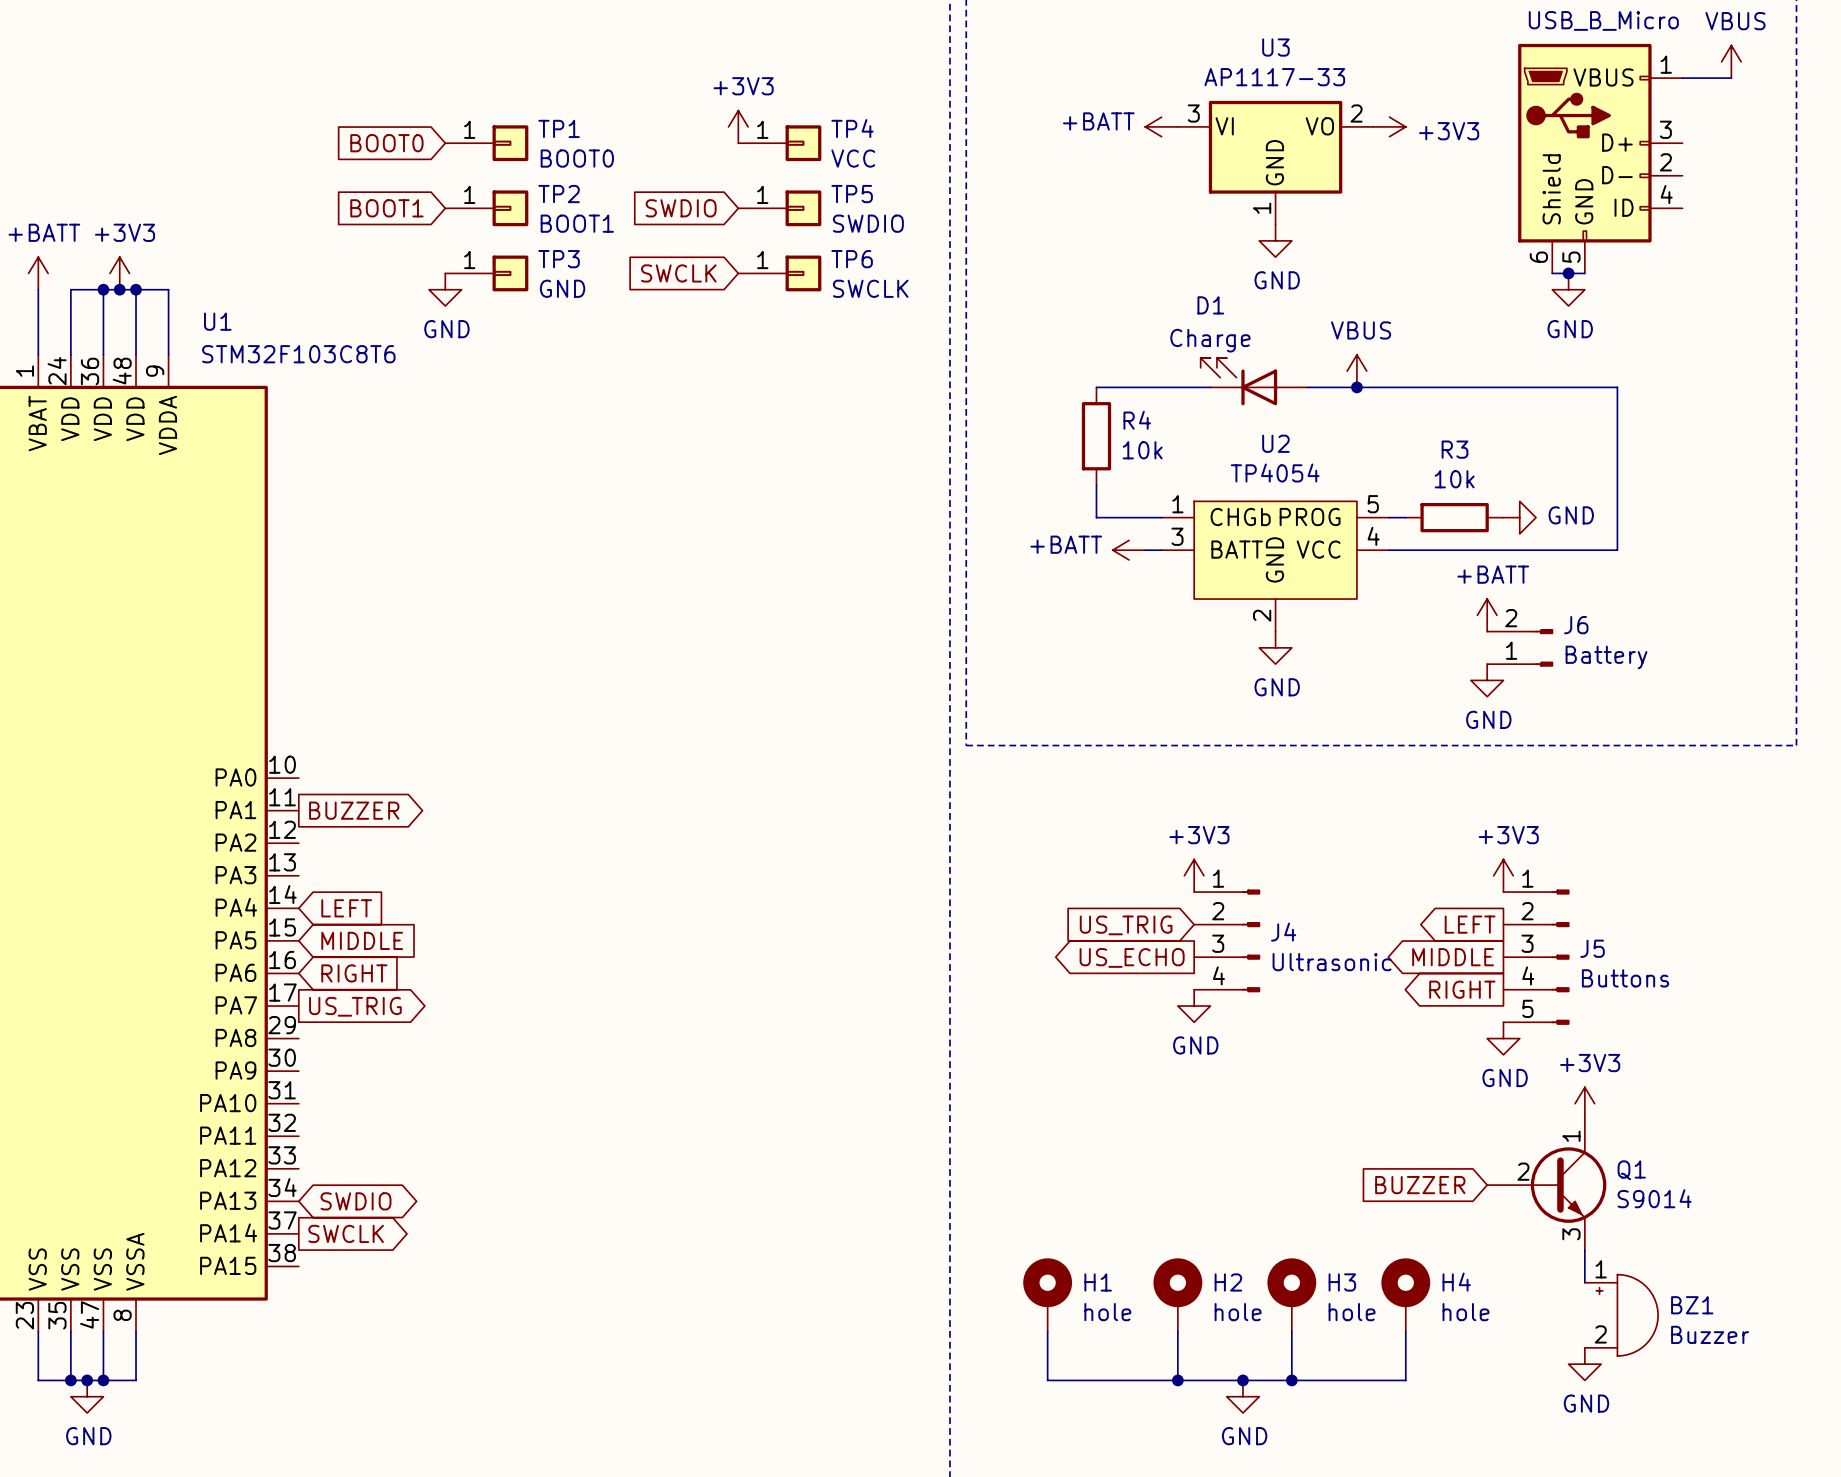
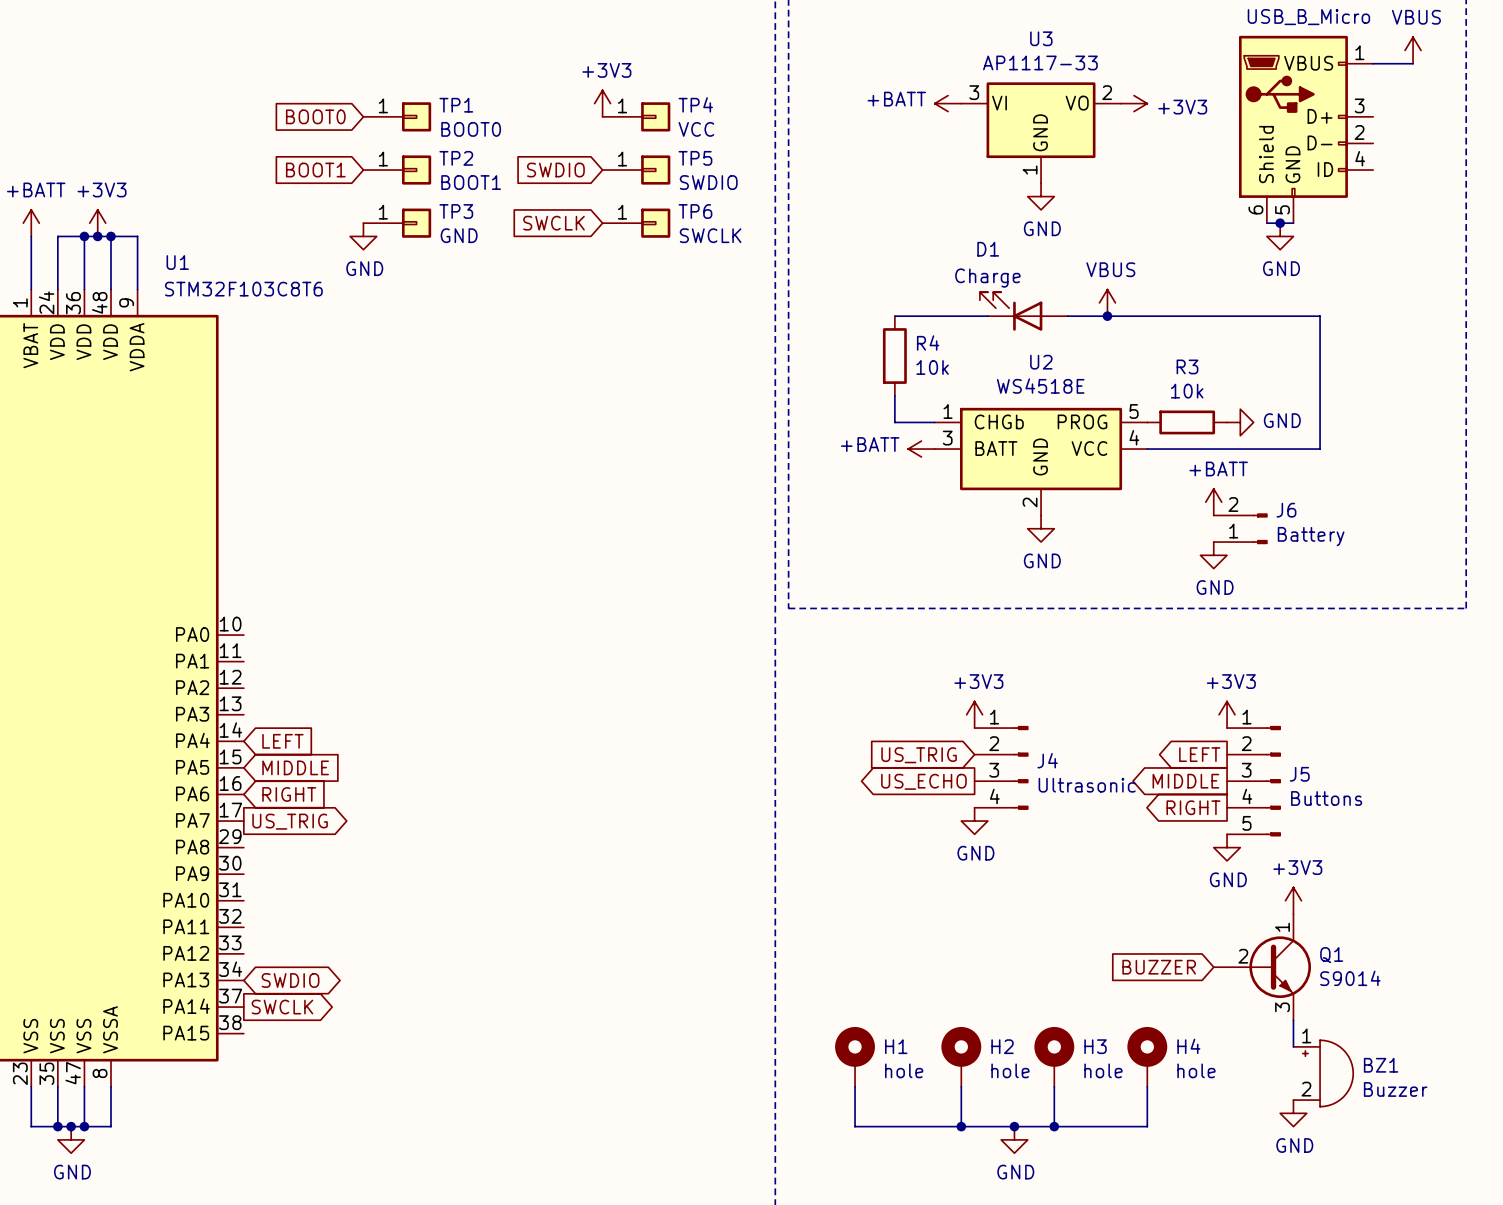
U2 value: TP4054 (1275, 473) -> WS4518E (1040, 386)
U2 symbol: [1161, 501, 1390, 632] -> [934, 407, 1148, 516]
global label: BUZZER (354, 810) -> none

